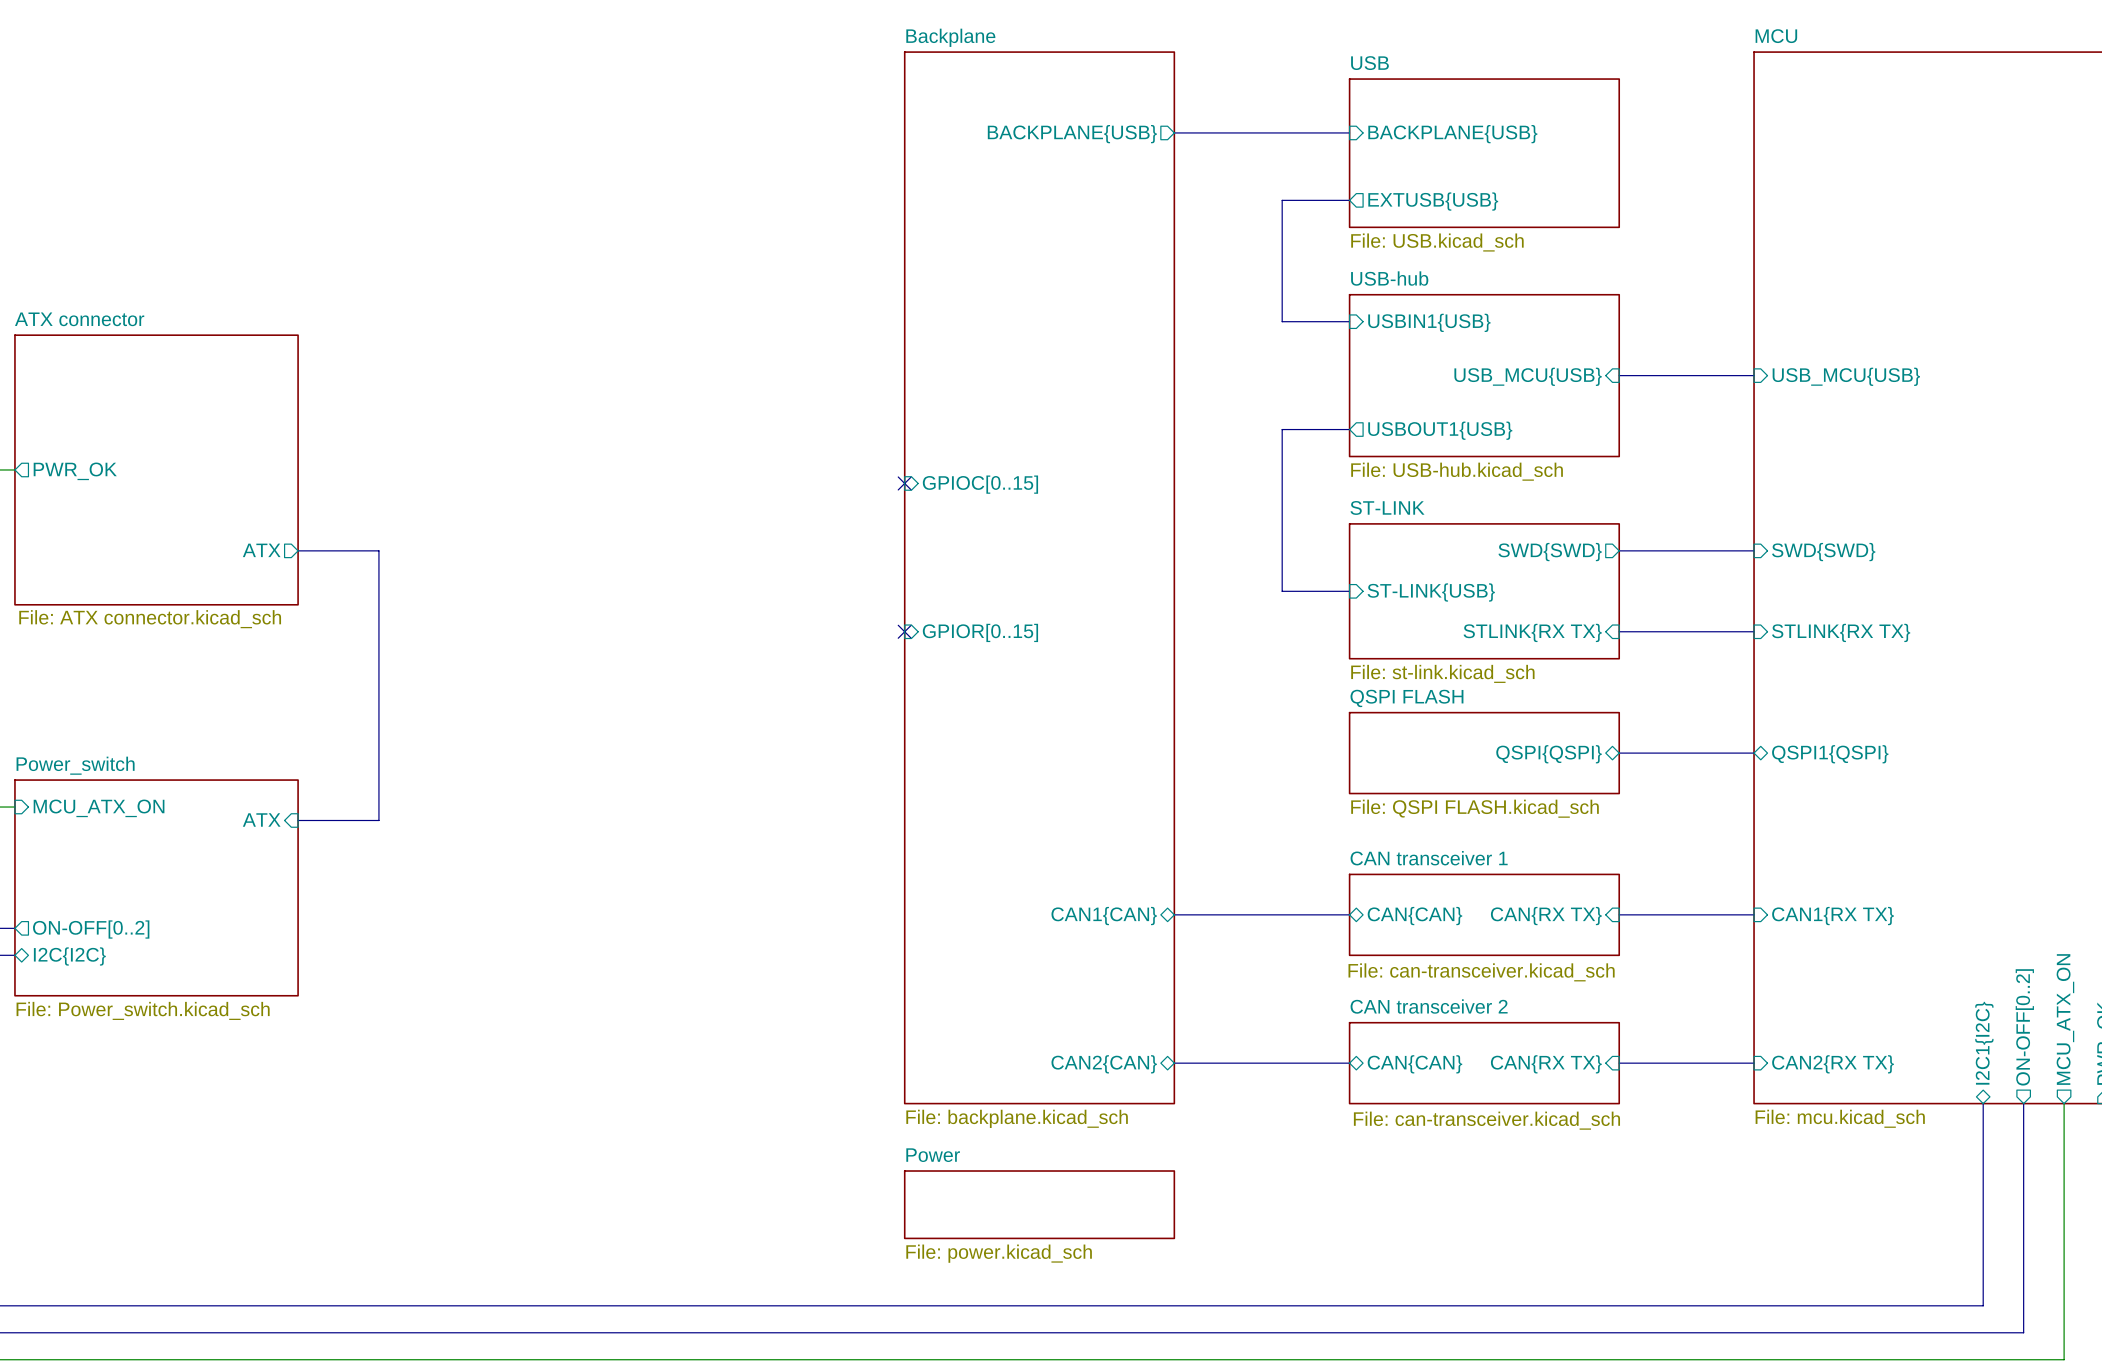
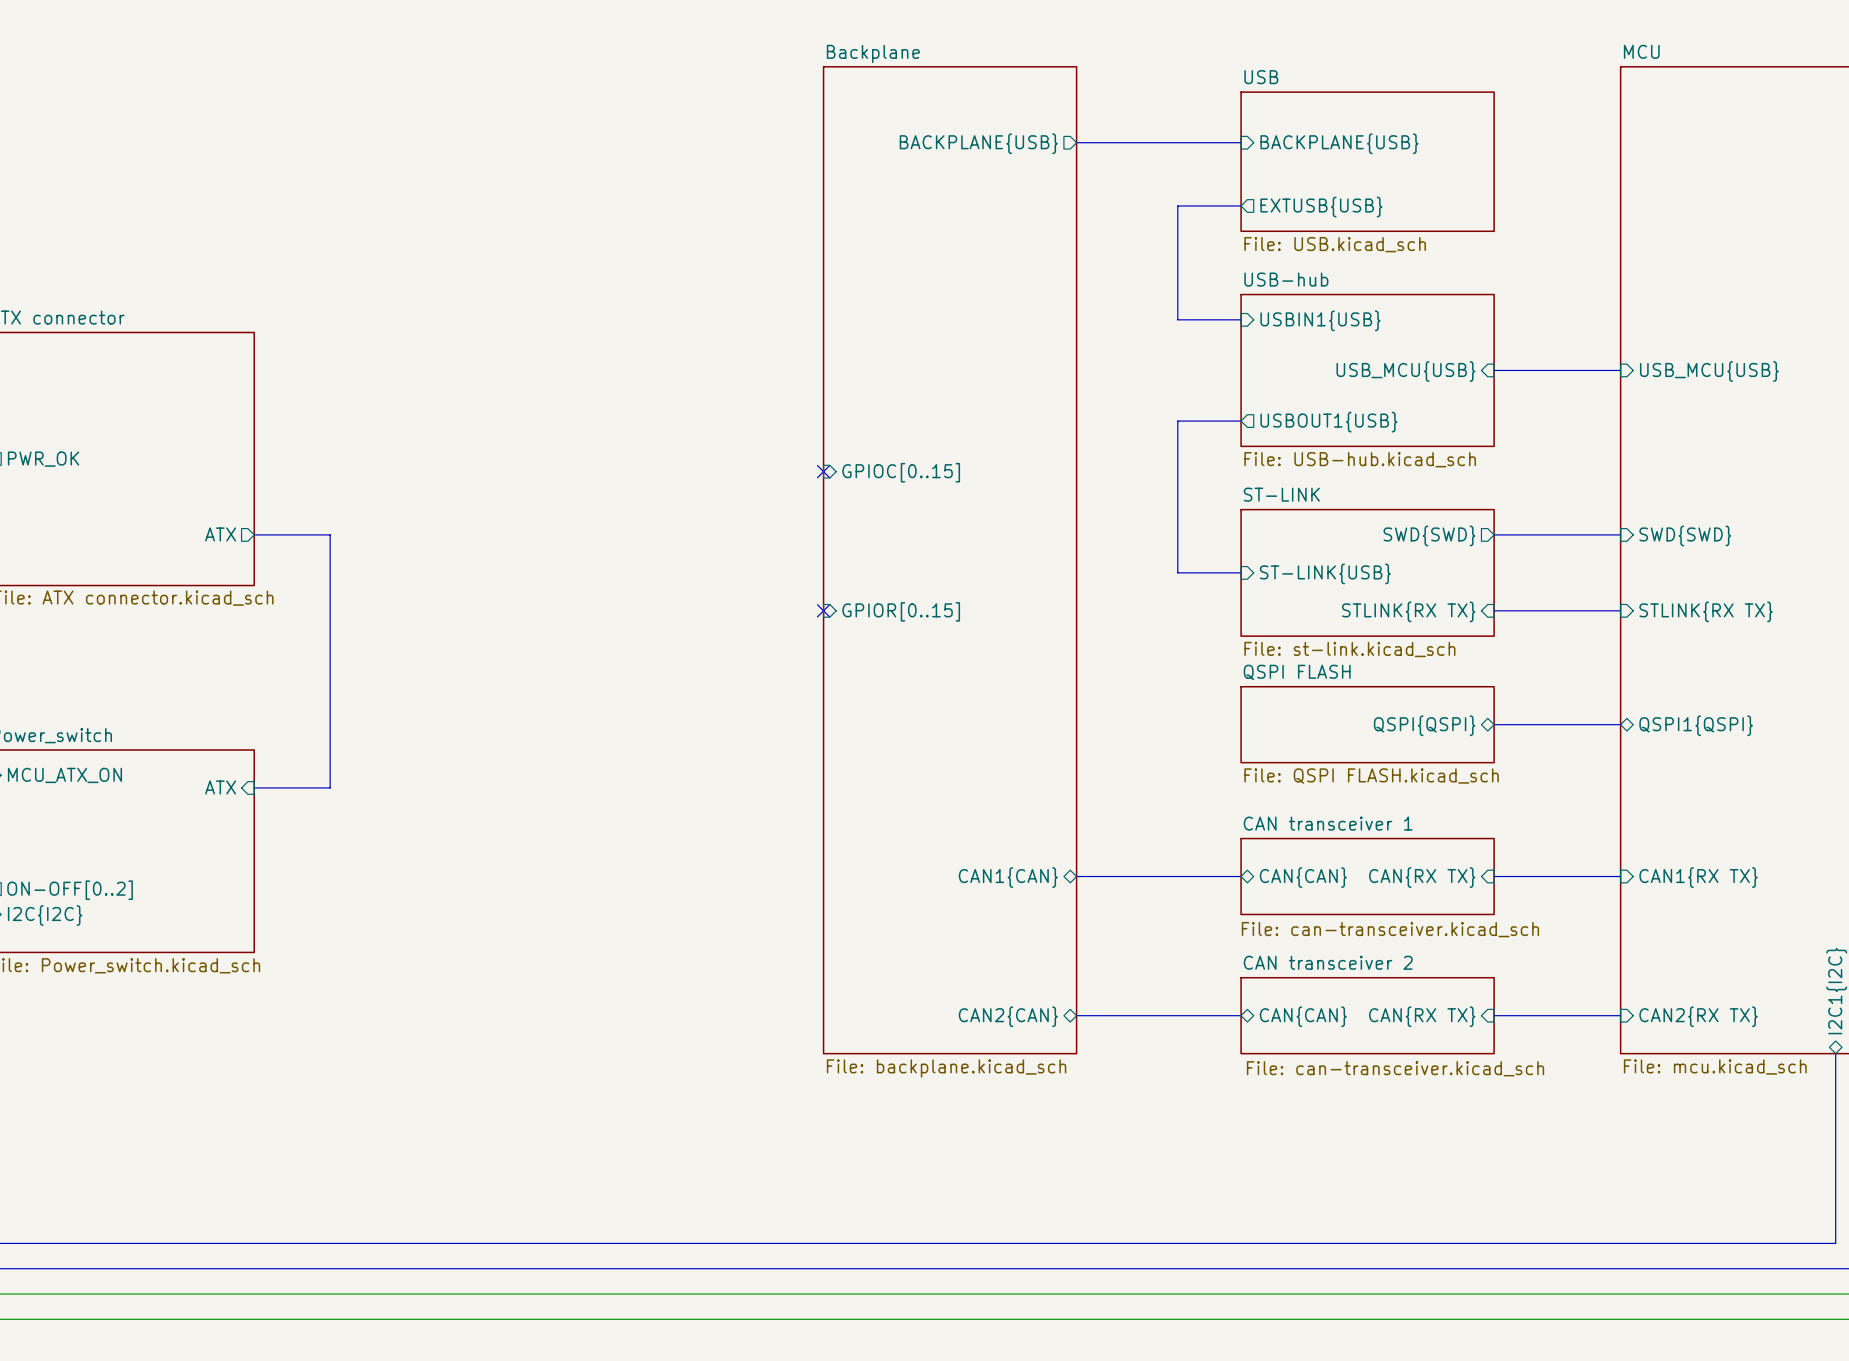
sheet Power: File: power.kicad_sch (1039, 1204) -> none

